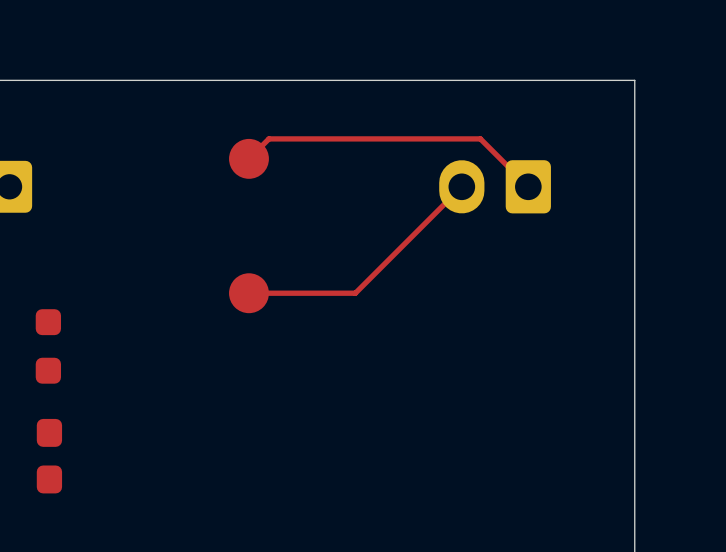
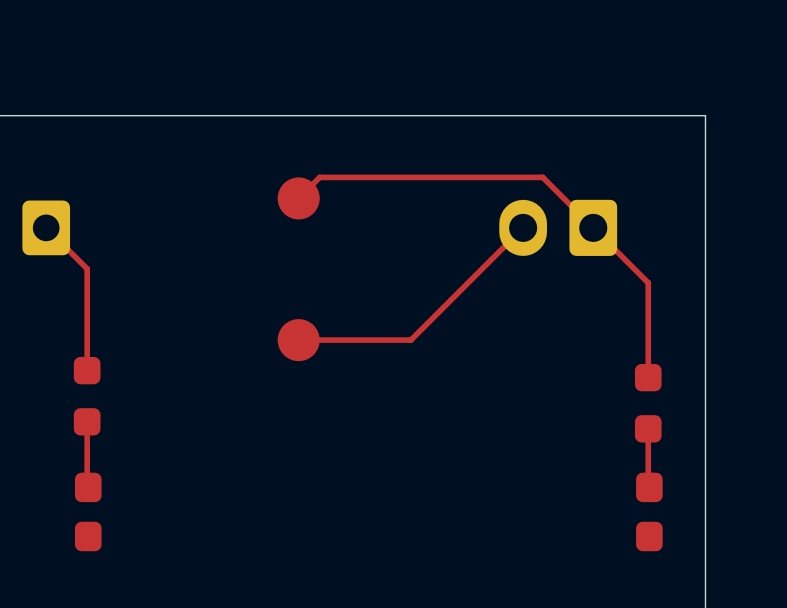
top track: none -> (46, 227) (87, 268) (87, 370)
top track: none -> (593, 227) (648, 282) (648, 377)
part: none -> (648, 403)
top track: none -> (87, 421) (88, 487)
top track: none -> (648, 428) (649, 487)
part: none -> (649, 511)

